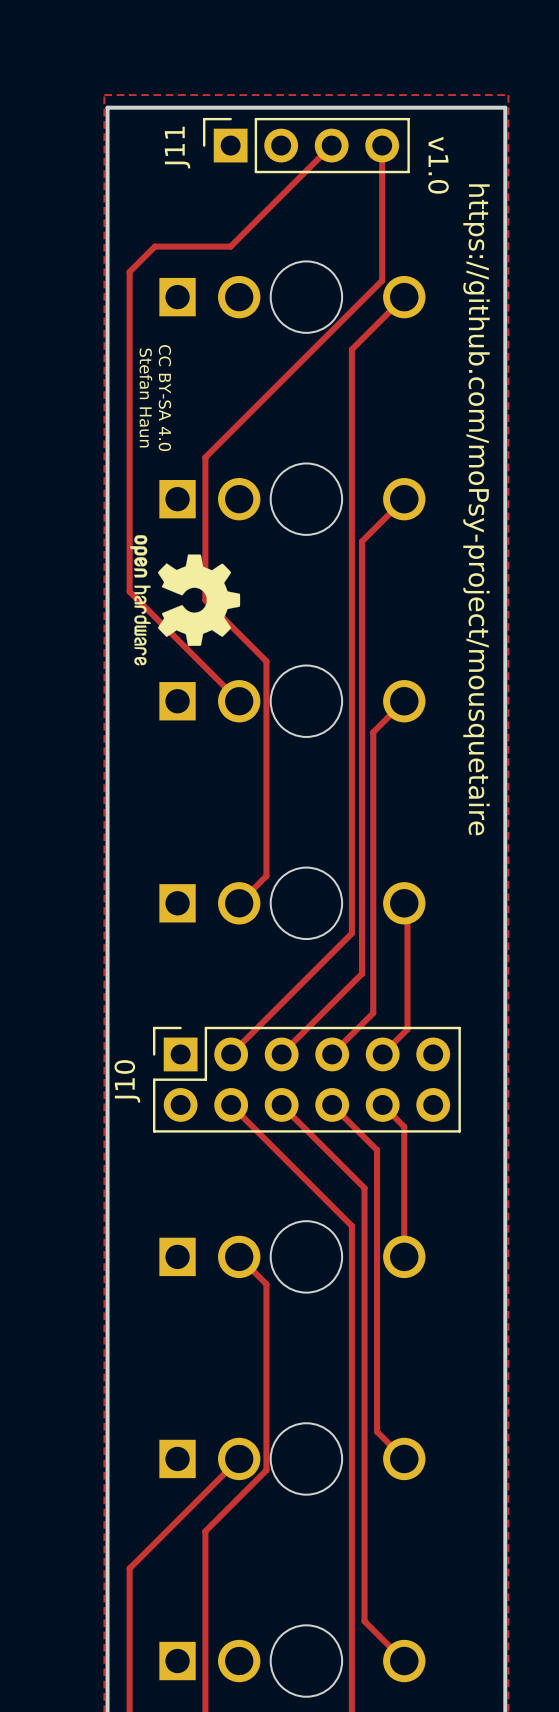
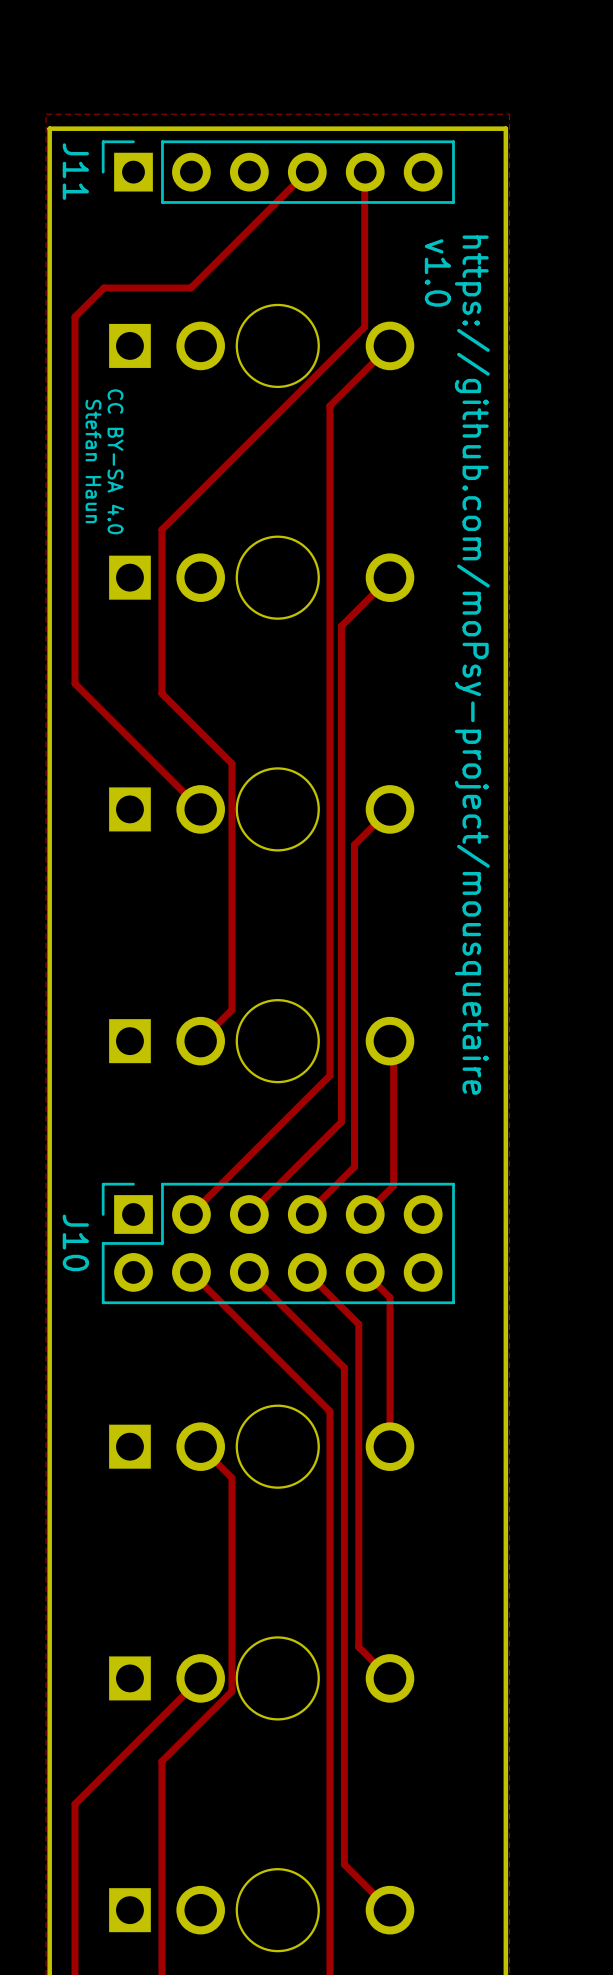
J11 footprint: [203, 117, 410, 174] -> [101, 140, 455, 204]
J11 name position: J11 (177, 147) -> J11 (75, 171)
text position: v1.0 (438, 165) -> v1.0 (437, 272)
text position: https://github.com/moPsy-project/mousquetaire (476, 509) -> https://github.com/moPsy-project/mousquetaire (472, 665)
drawing: [129, 535, 241, 666] -> none
J10 name rotation: 0° (127, 1081) -> 180° (75, 1242)

